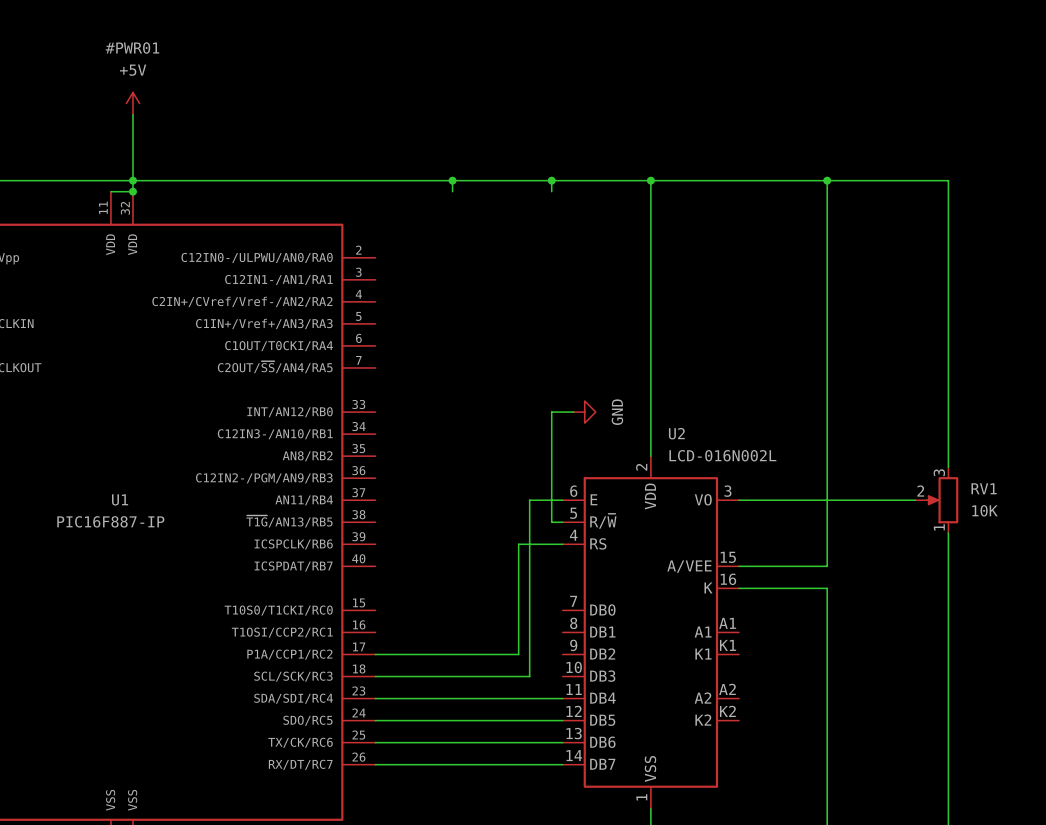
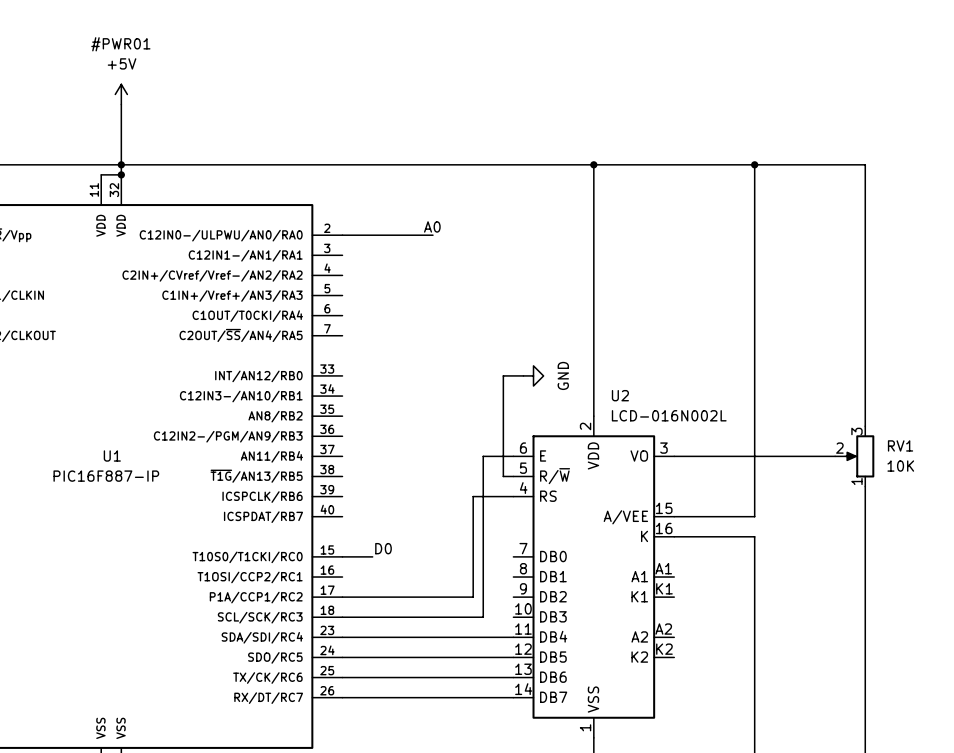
wire: (452, 180) (452, 191) -> none
junction: (452, 180) -> none
wire: (551, 180) (551, 191) -> none
junction: (551, 180) -> none
text: none -> A0 (432, 226)
wire: none -> (342, 235) (432, 235)
text: none -> D0 (383, 548)
wire: none -> (342, 556) (372, 556)

